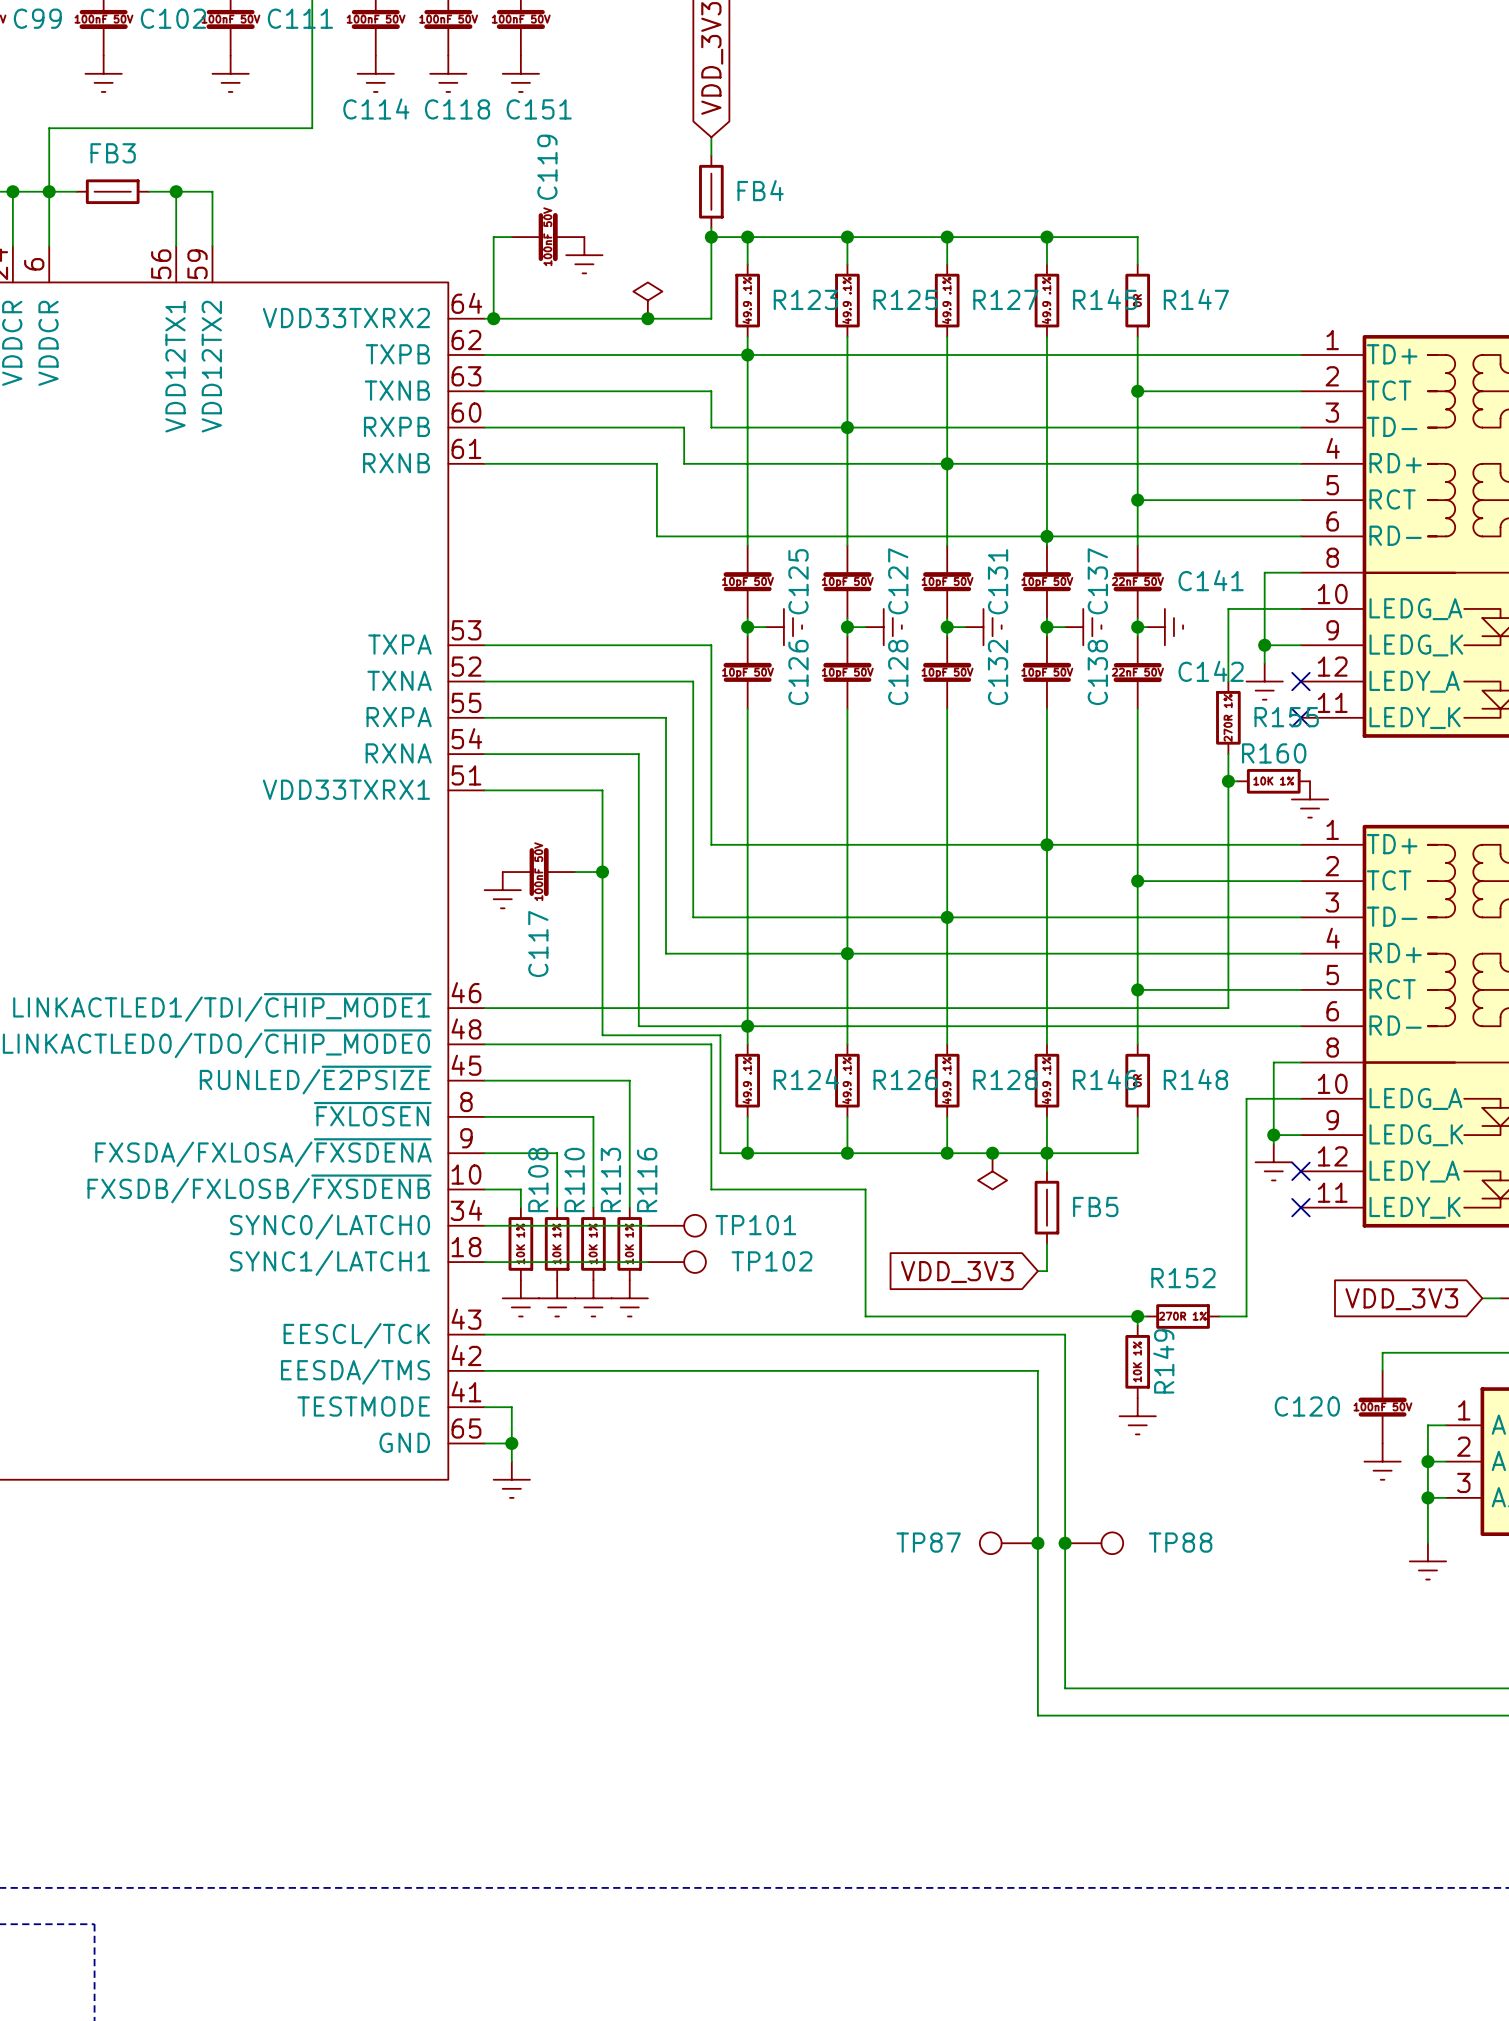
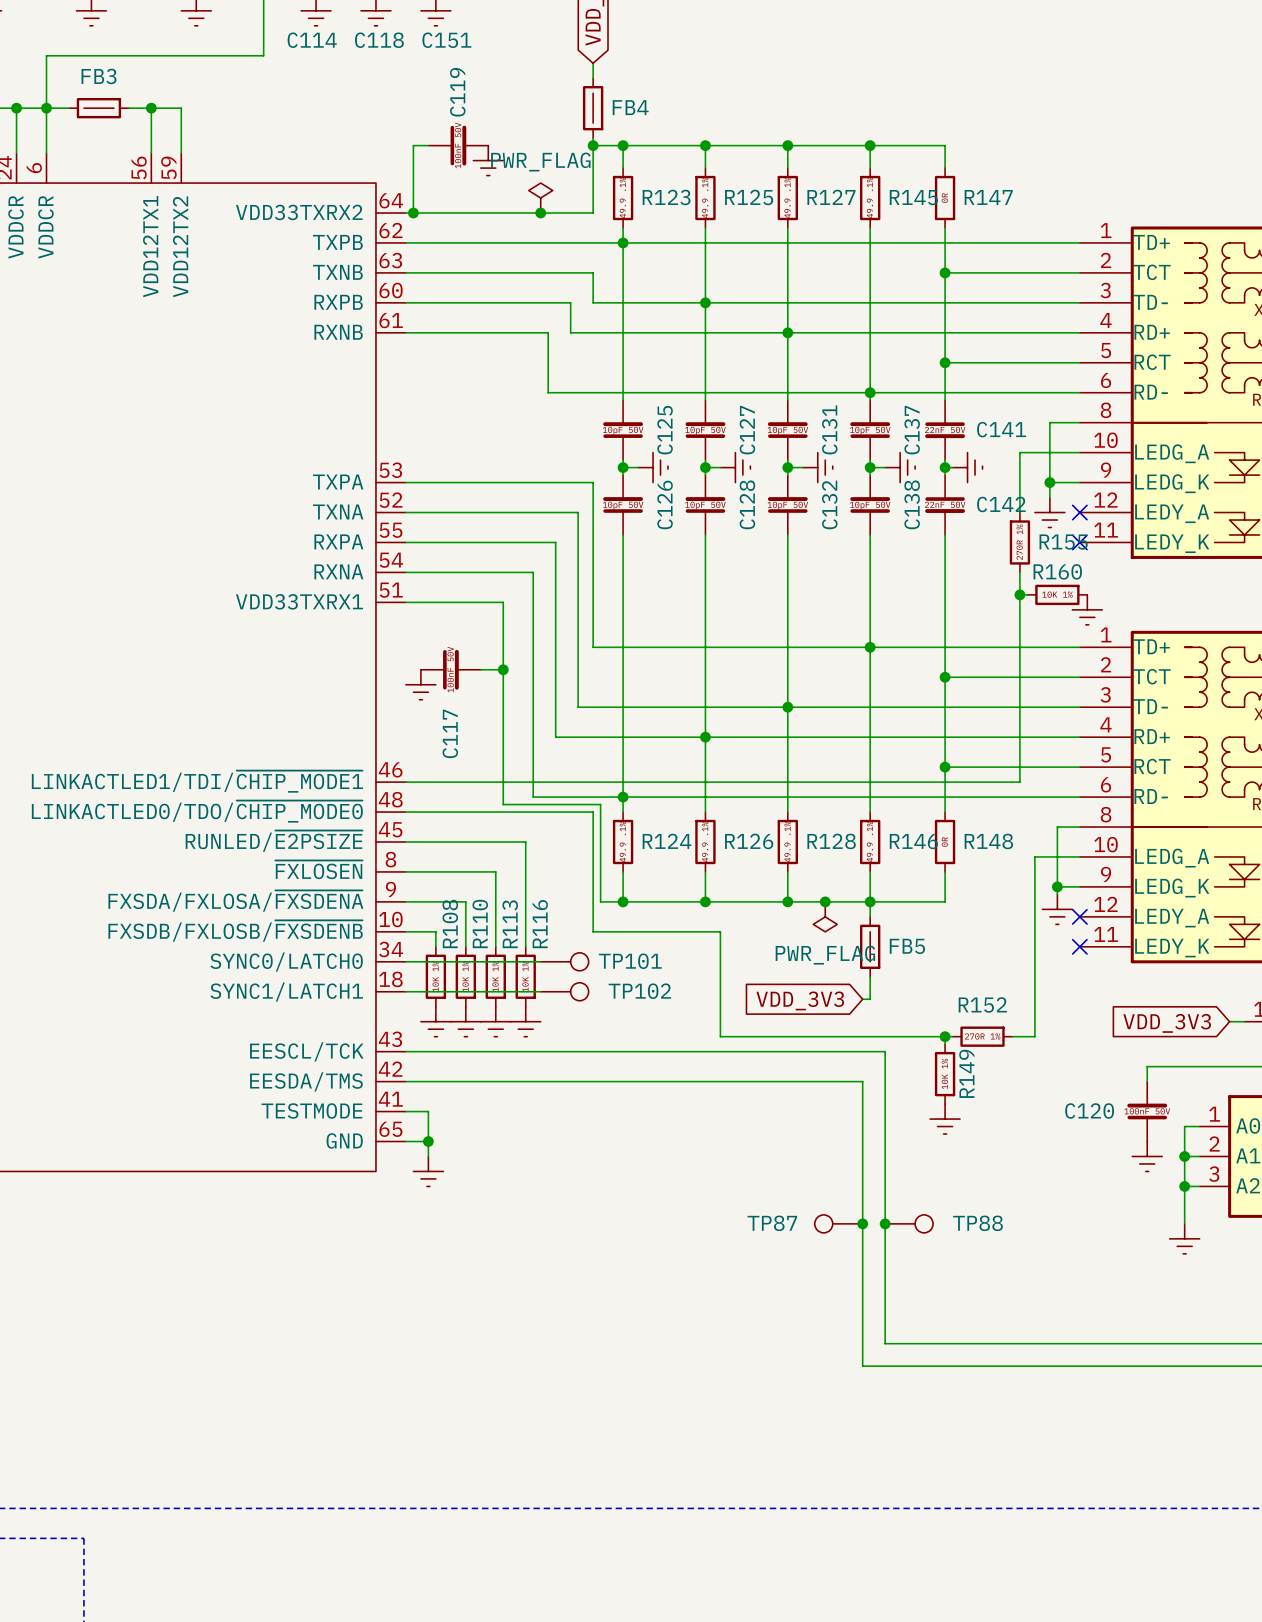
power symbol text: none -> PWR_FLAG (540, 162)
power symbol text: none -> PWR_FLAG (825, 955)

